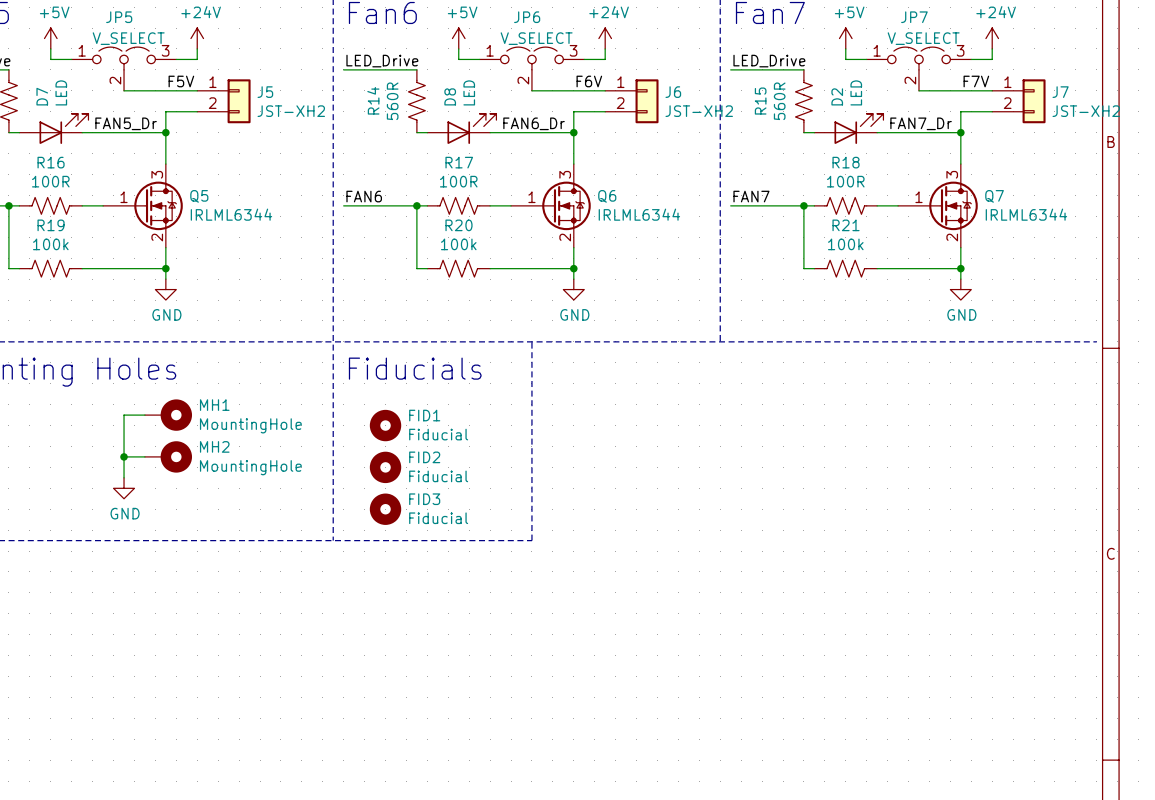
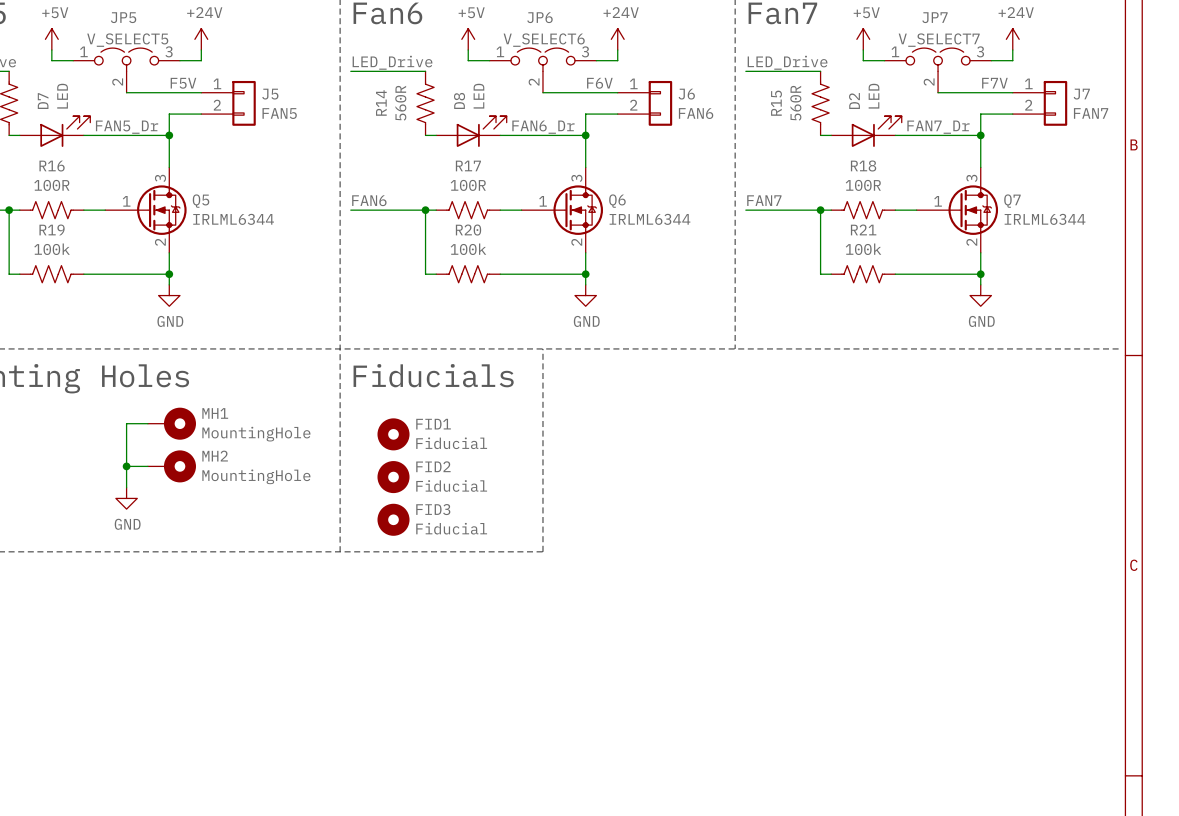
JP5 value: V_SELECT (128, 38) -> V_SELECT5 (127, 40)
JP6 value: V_SELECT (536, 38) -> V_SELECT6 (544, 40)
JP7 value: V_SELECT (923, 38) -> V_SELECT7 (939, 40)
J5 value: JST-XH2 (291, 111) -> FAN5 (279, 113)
J6 value: JST-XH2 (699, 111) -> FAN6 (696, 113)
J7 value: JST-XH2 (1086, 111) -> FAN7 (1091, 113)

